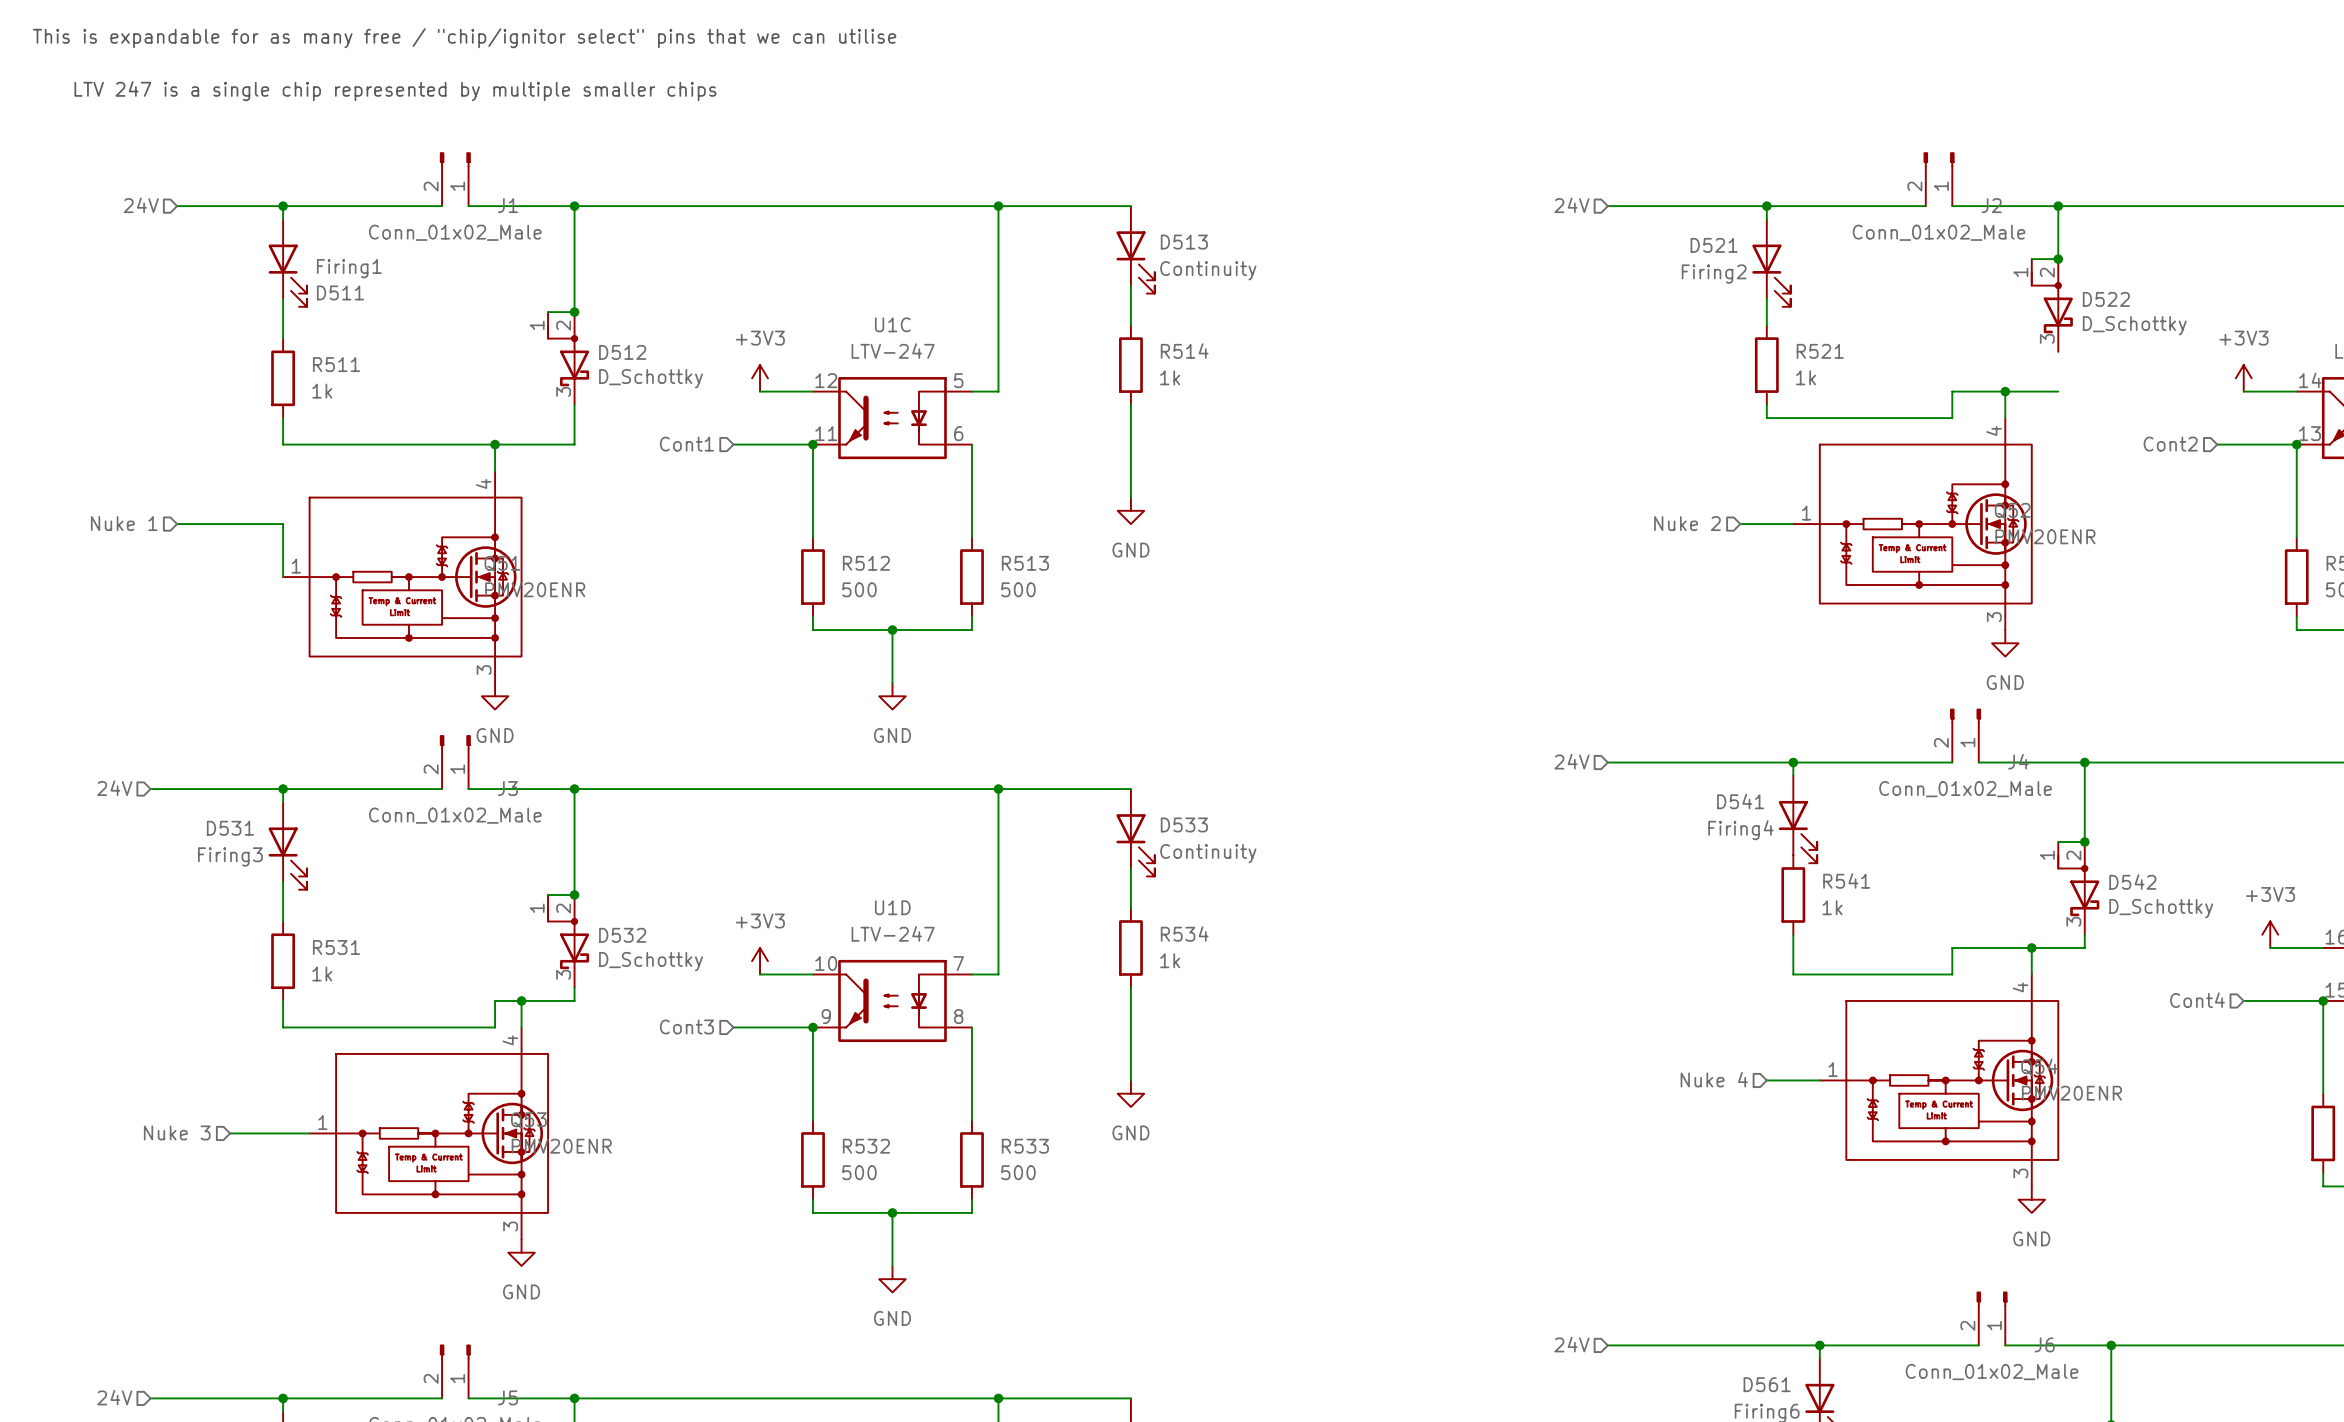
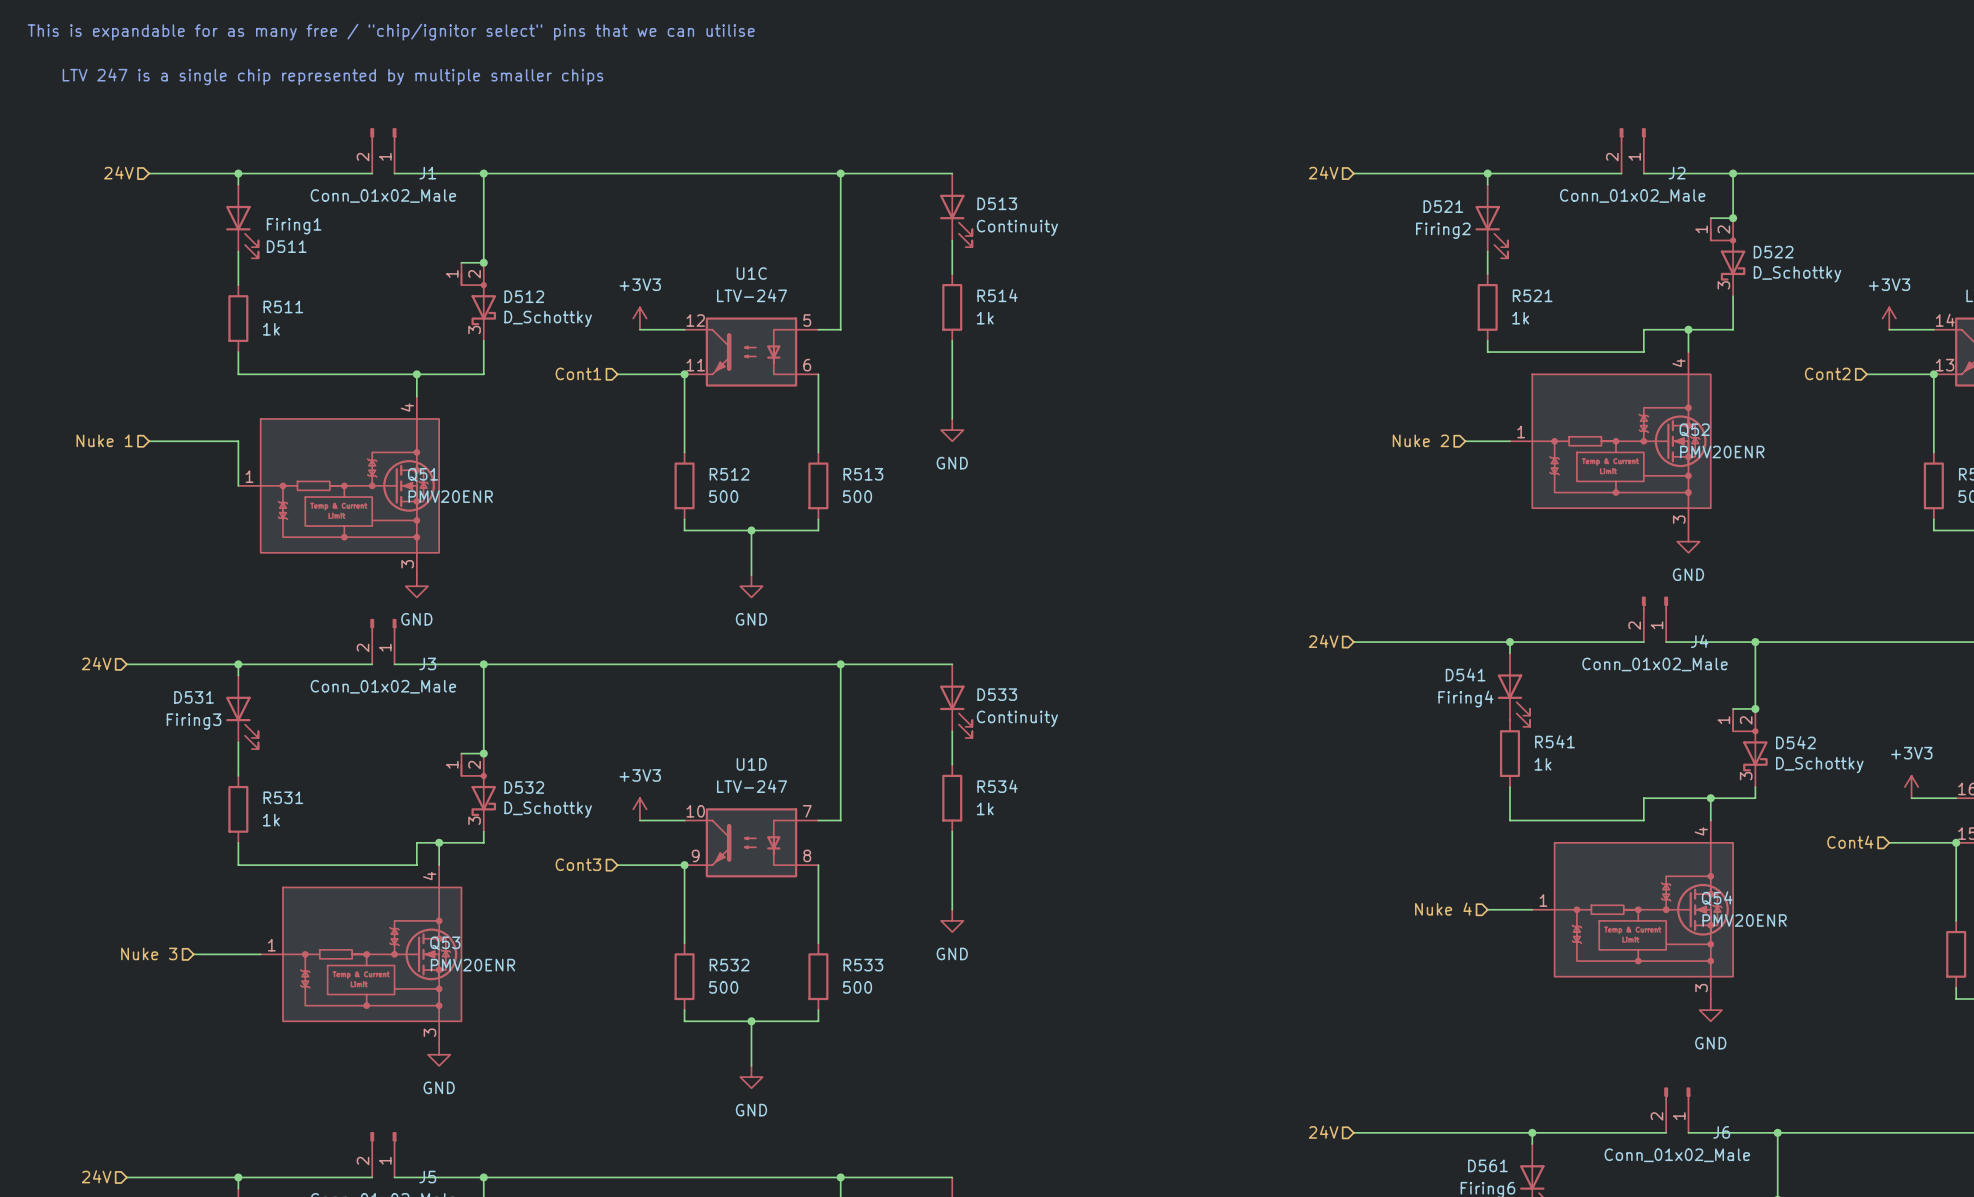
wire: none -> (1733, 296) (1733, 329)

